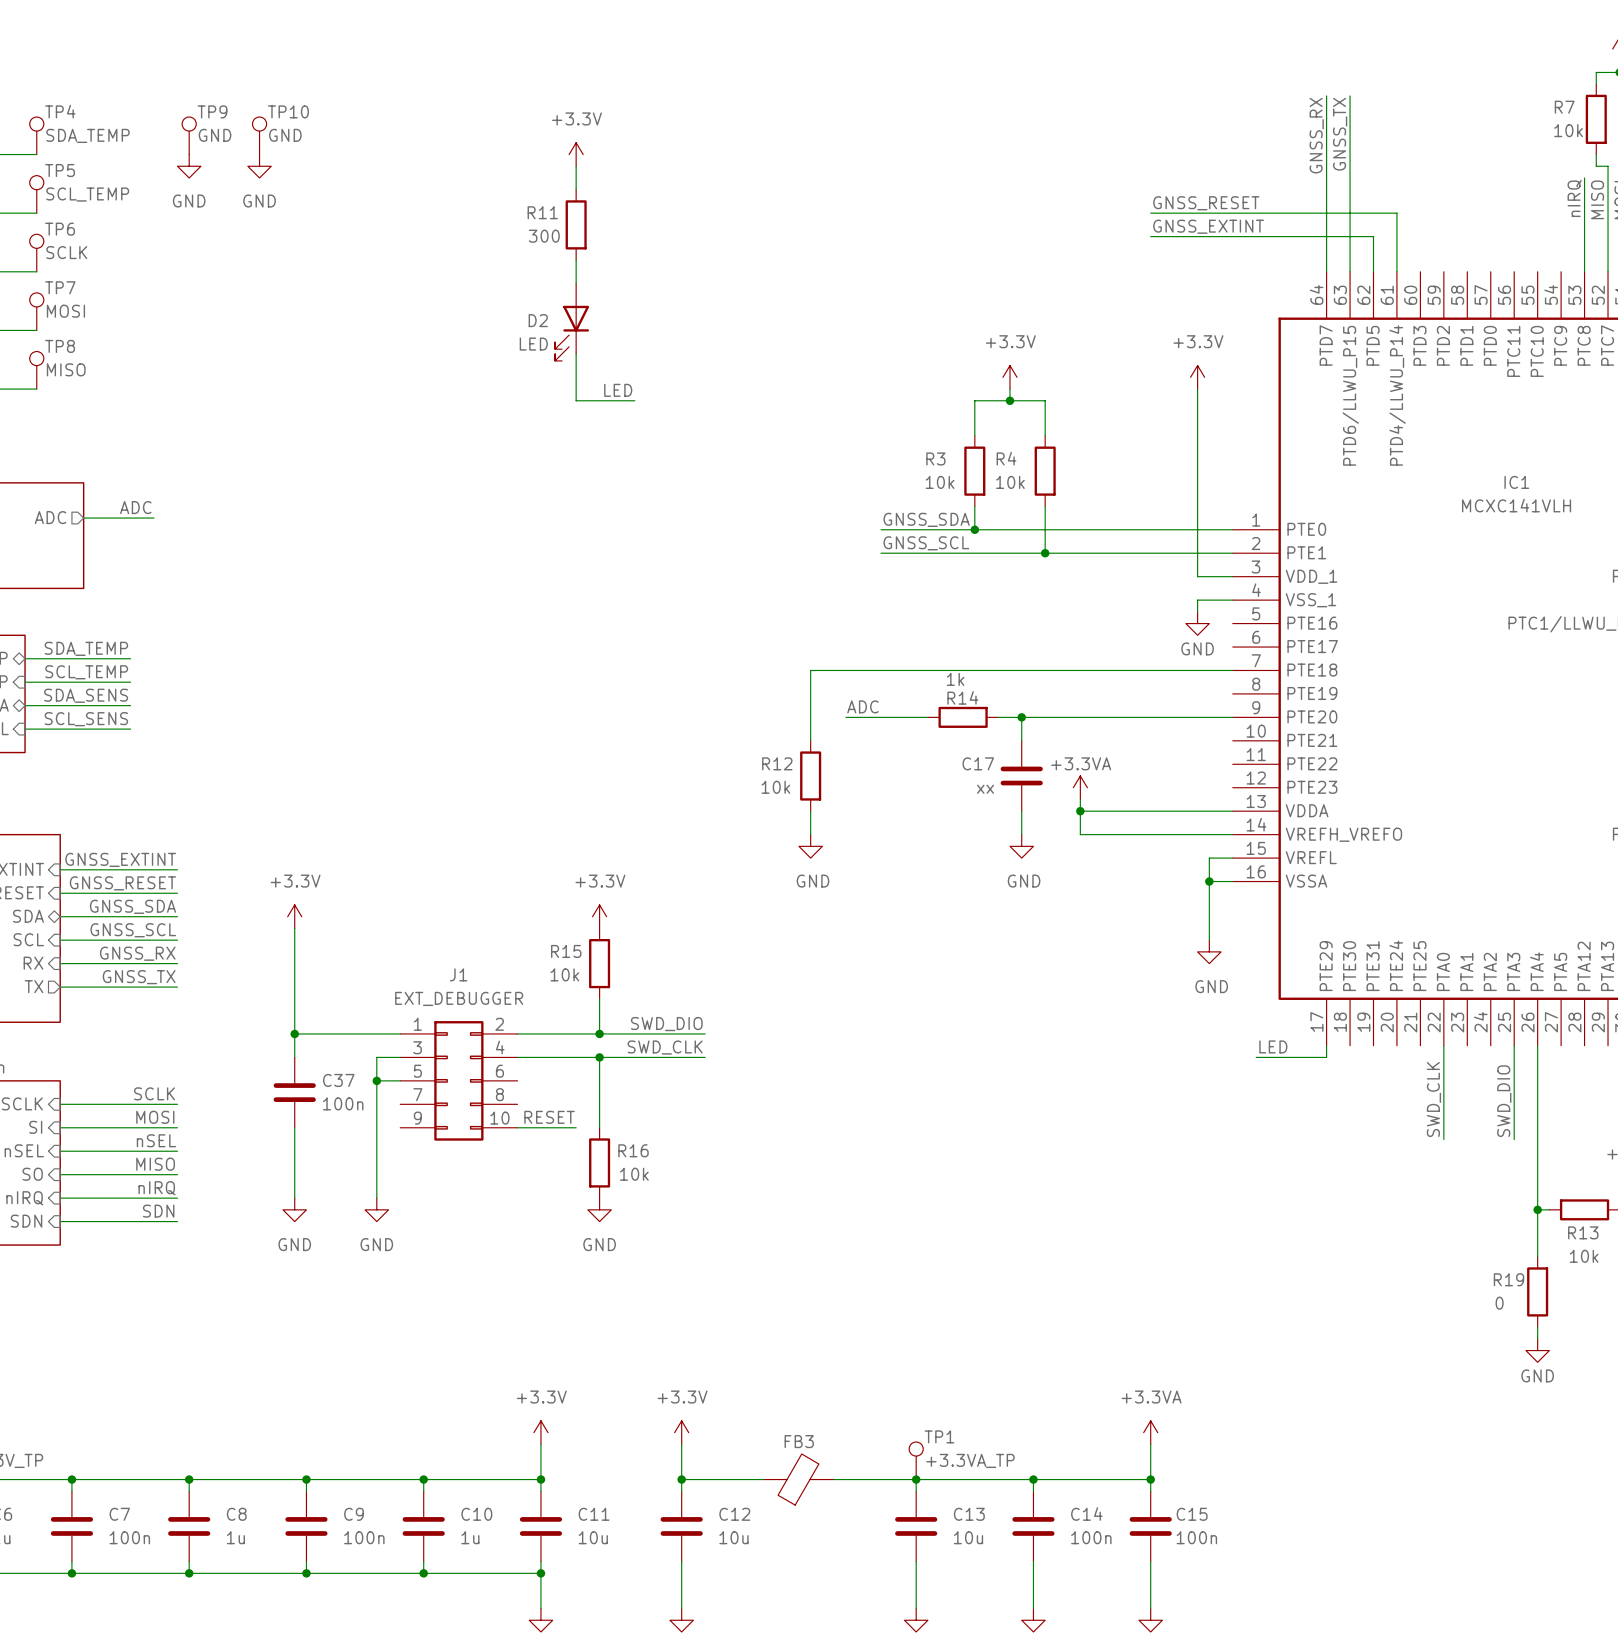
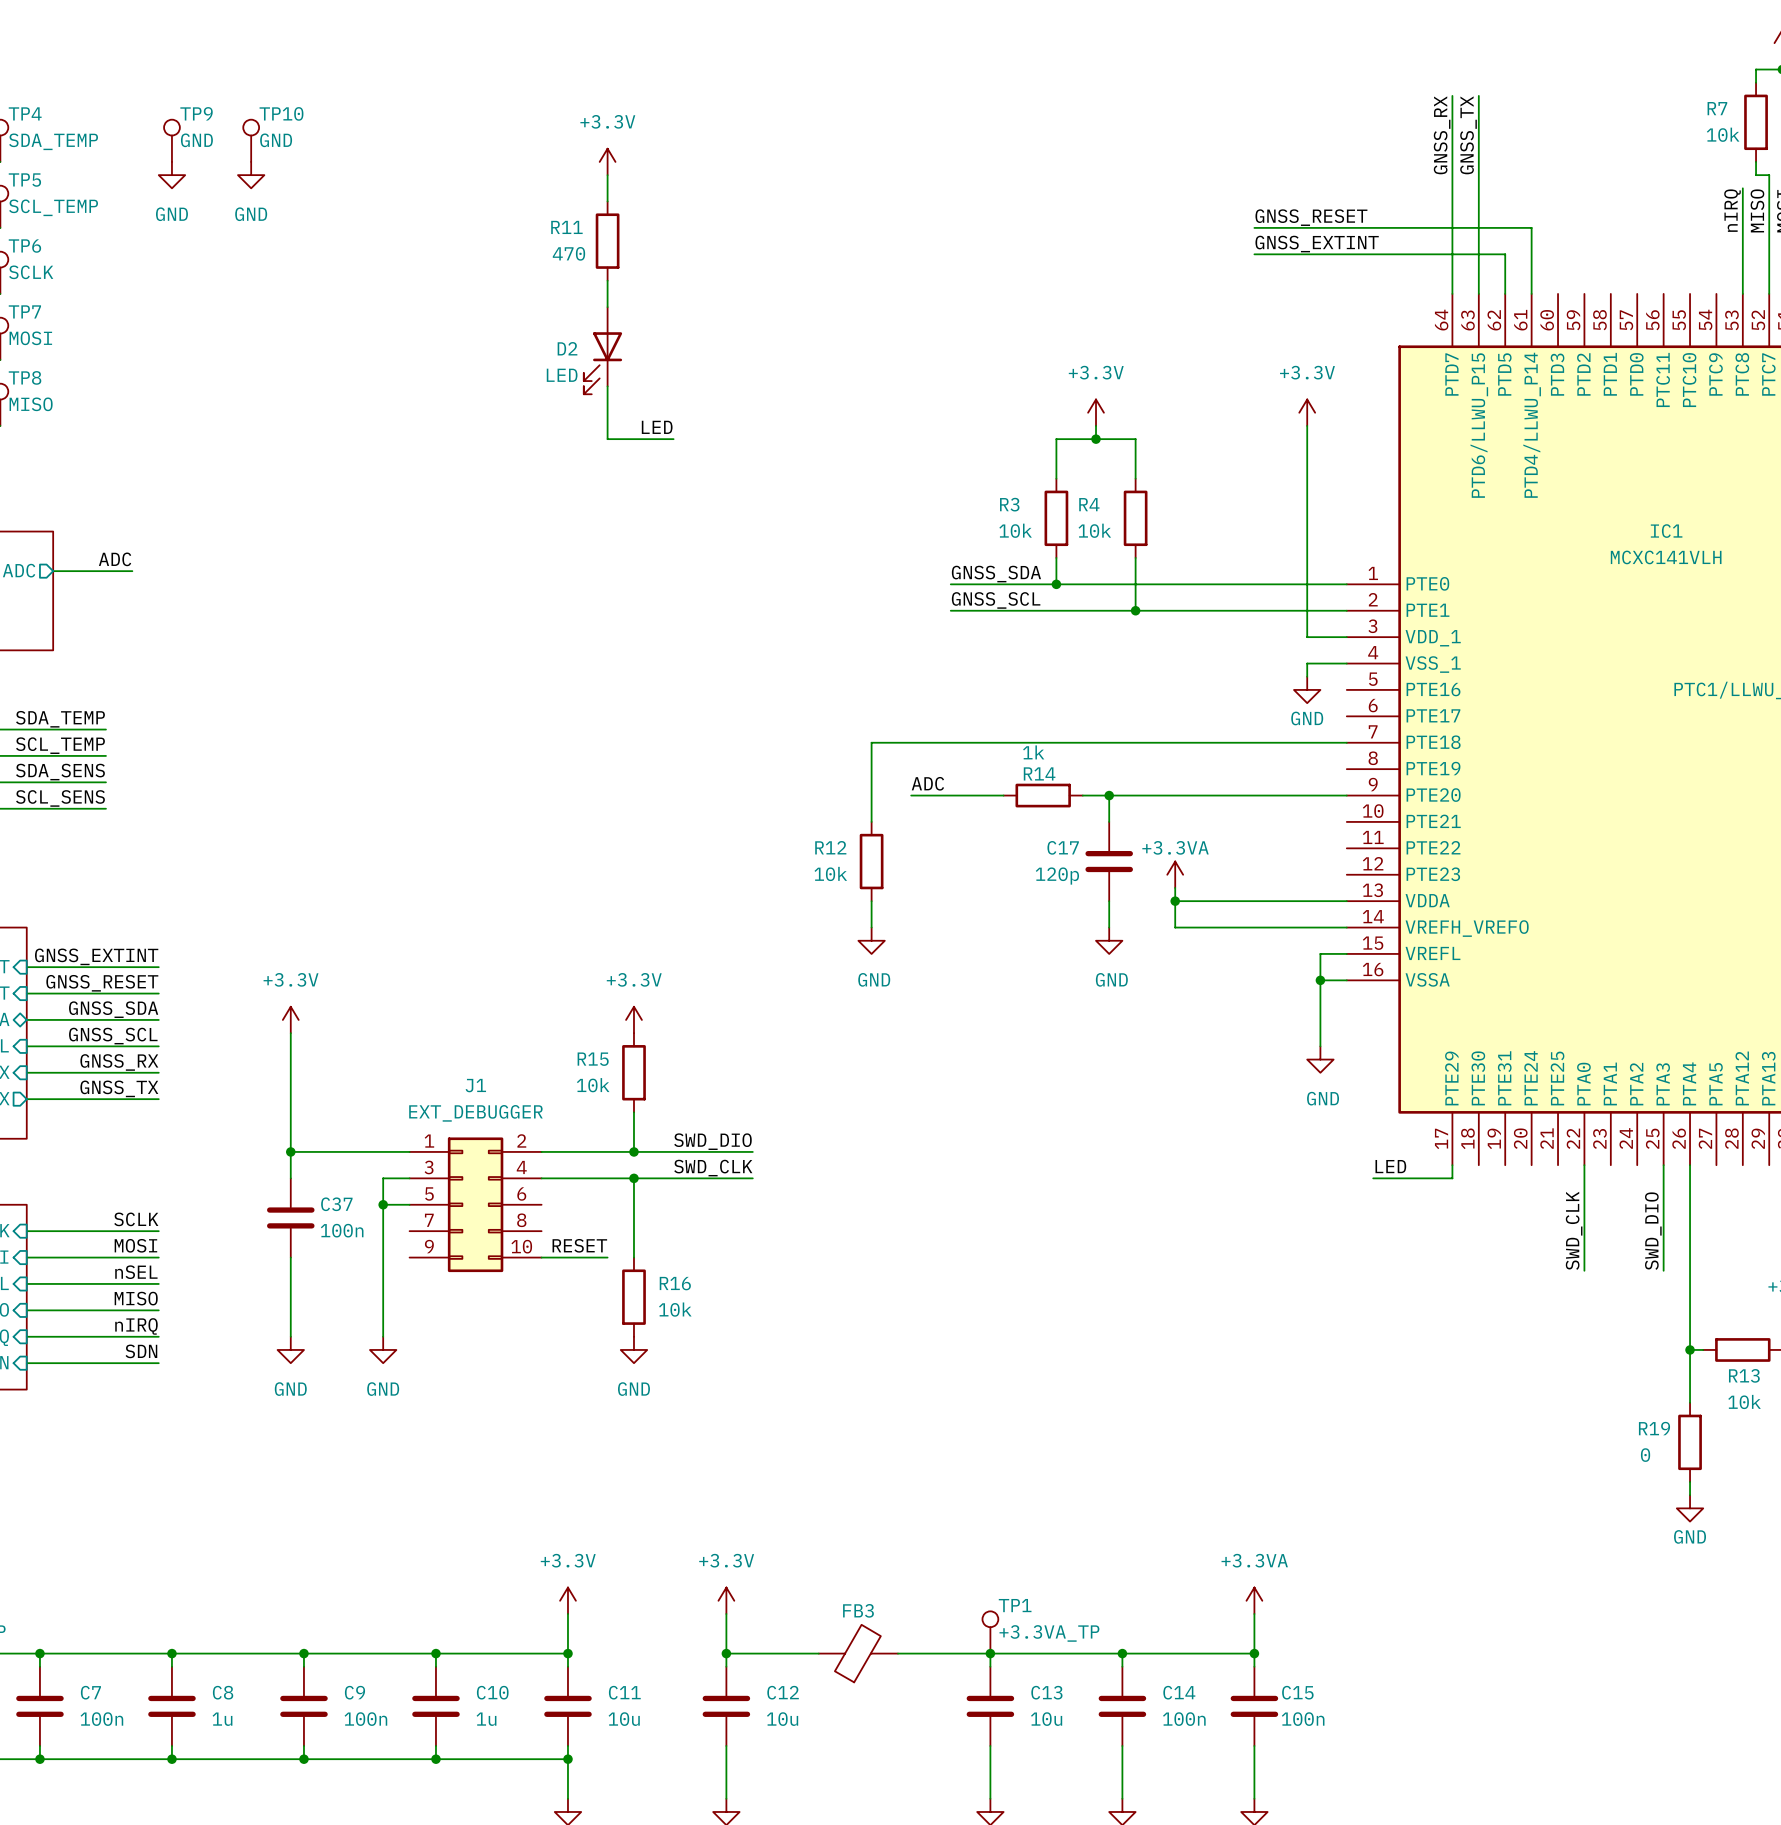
R11 value: 300 (544, 236) -> 470 (568, 253)
C17 value: xx (985, 789) -> 120p (1057, 876)

